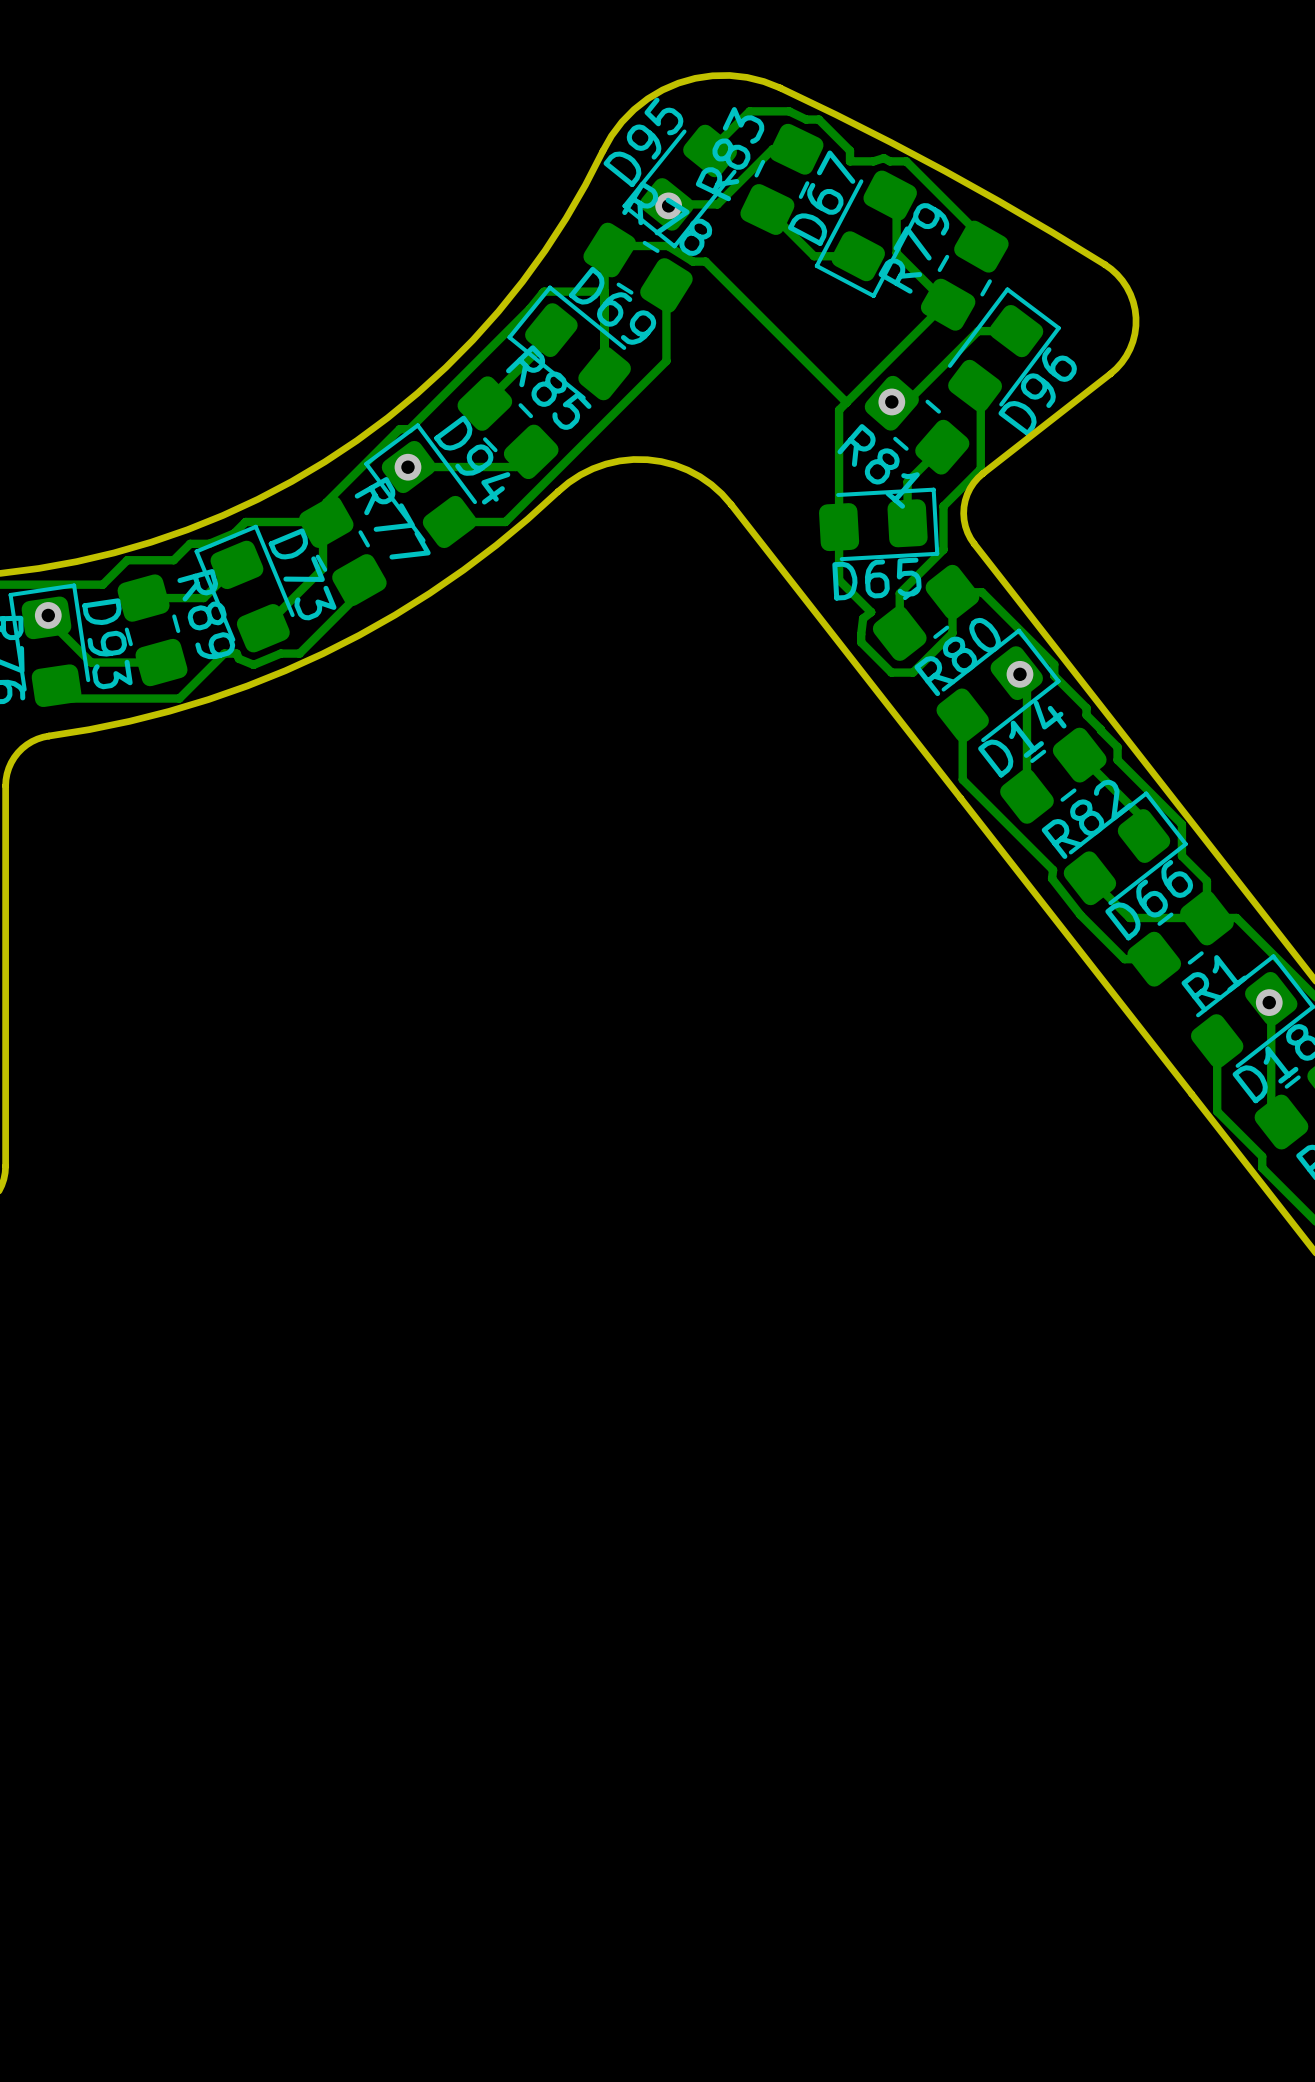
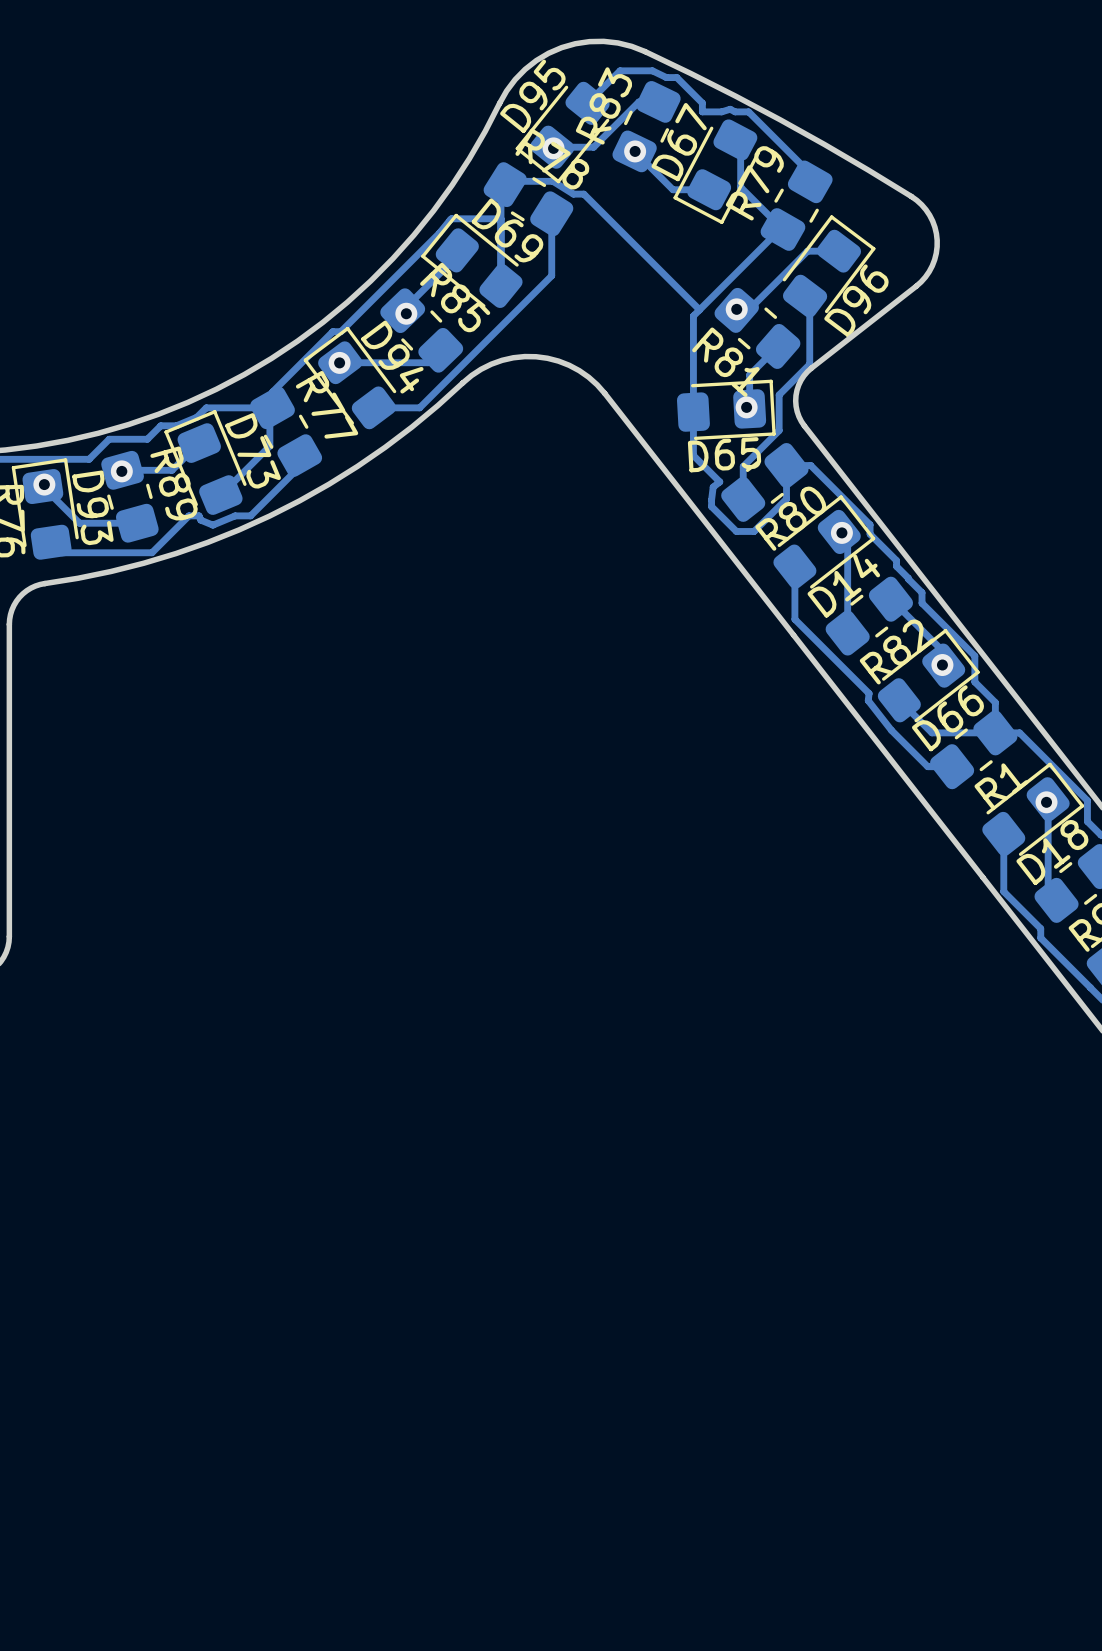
via: none -> (635, 151)
via: none -> (406, 313)
via: none -> (746, 407)
via: none -> (121, 471)
via: none -> (942, 665)

